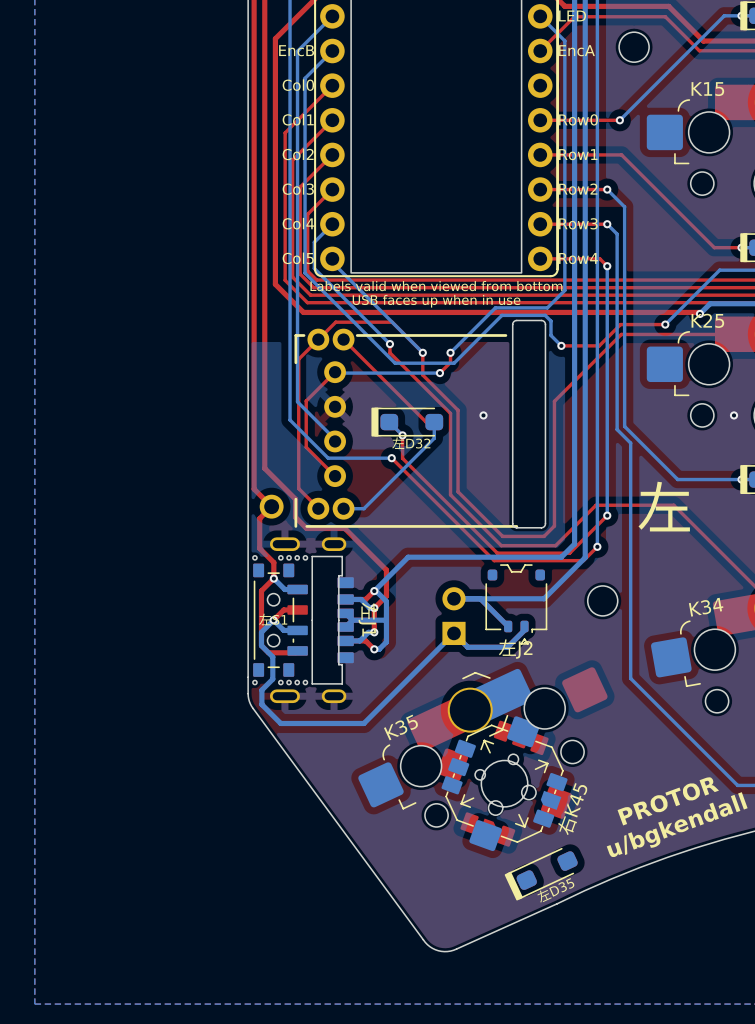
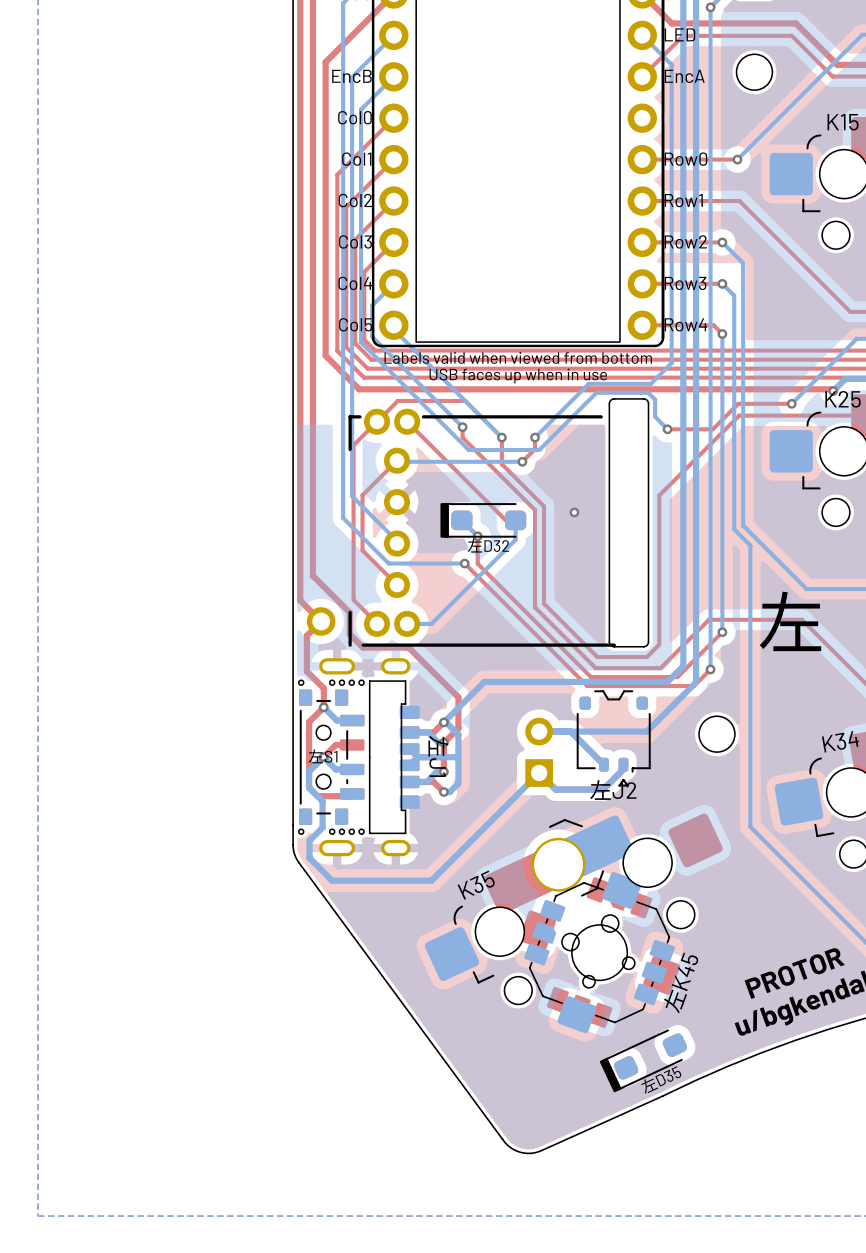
part rotation: 0° (504, 783) -> 180° (599, 952)
右K45: (504, 783) -> none
左K45: none -> (599, 952)

